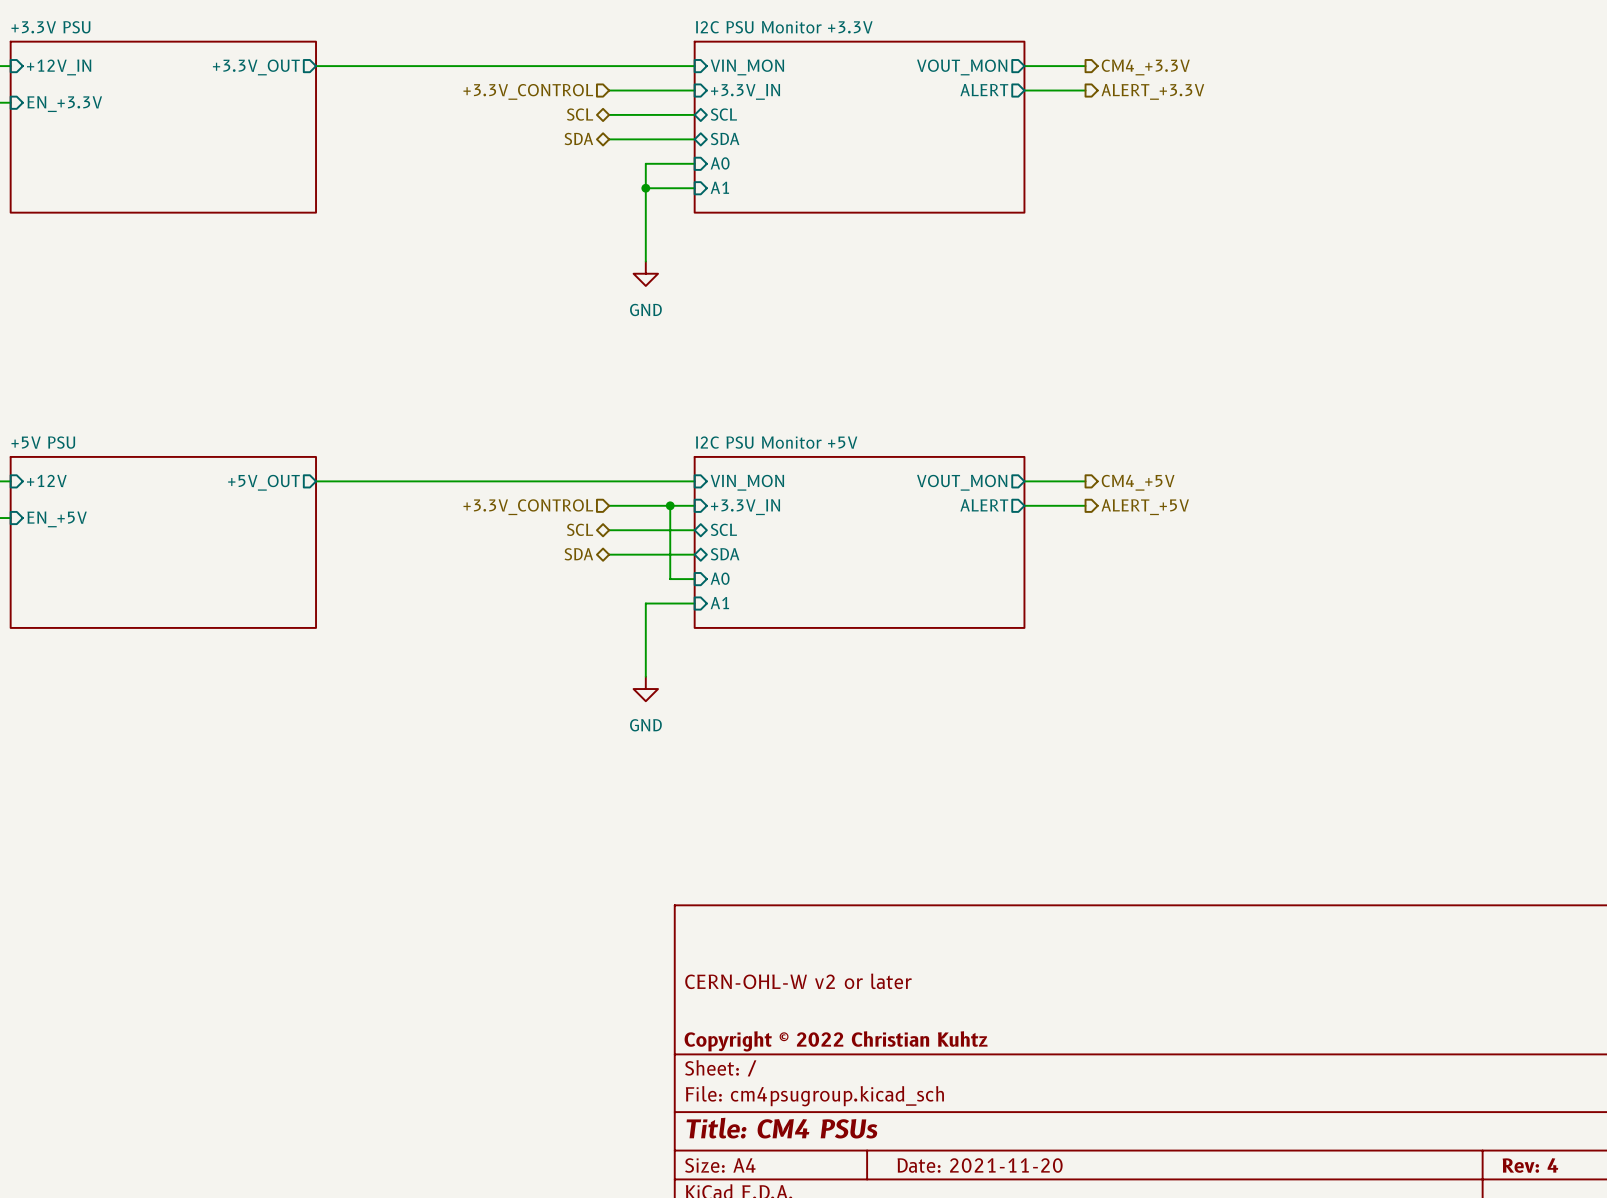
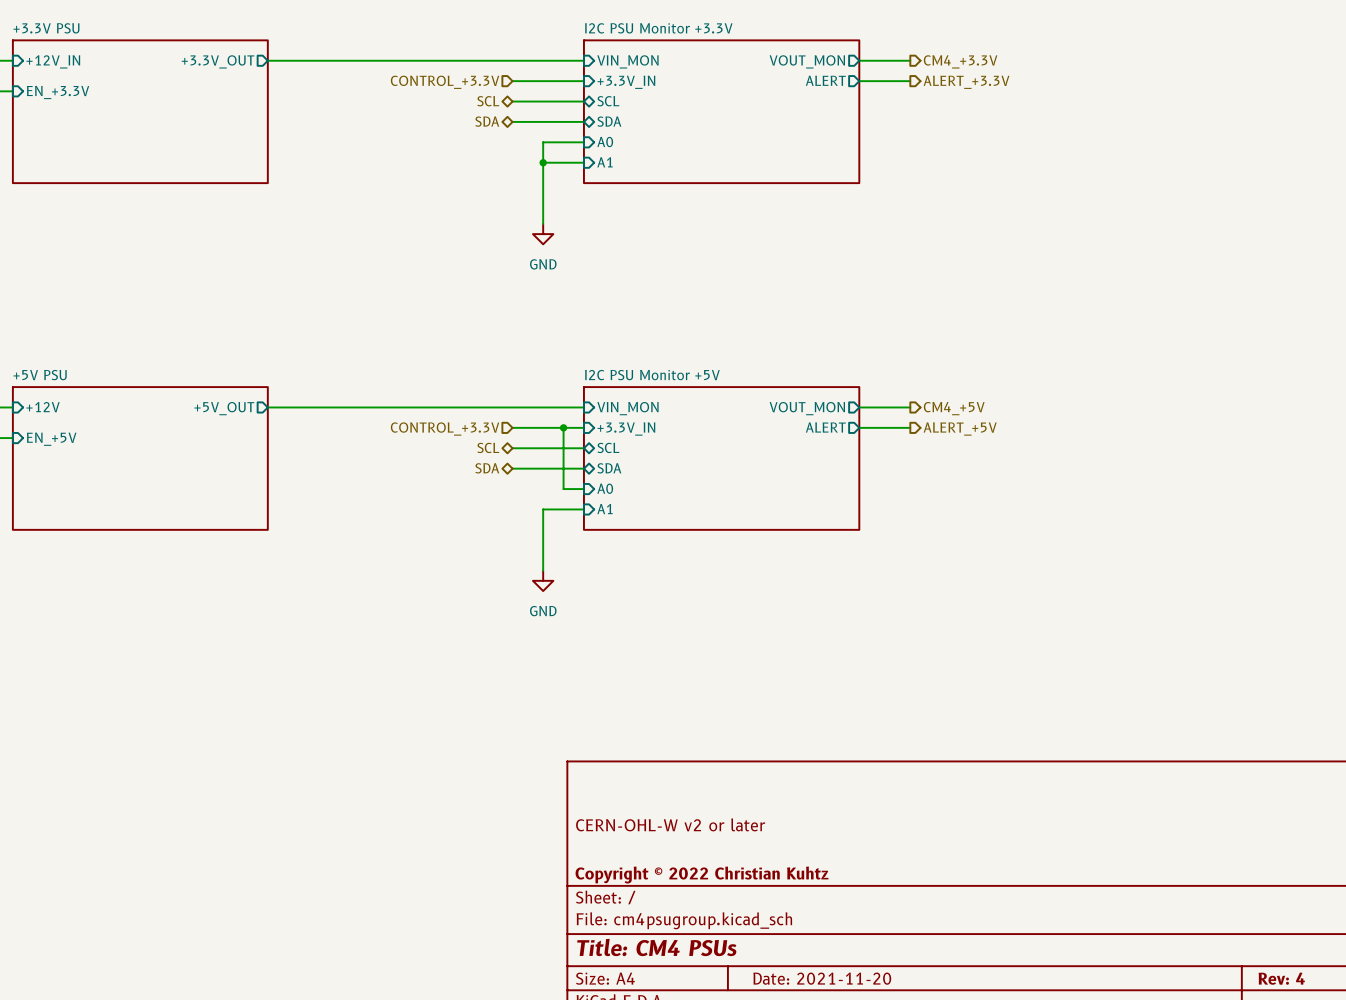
hierarchical label: +3.3V_CONTROL (528, 91) -> CONTROL_+3.3V (445, 82)
hierarchical label: +3.3V_CONTROL (528, 507) -> CONTROL_+3.3V (445, 429)

